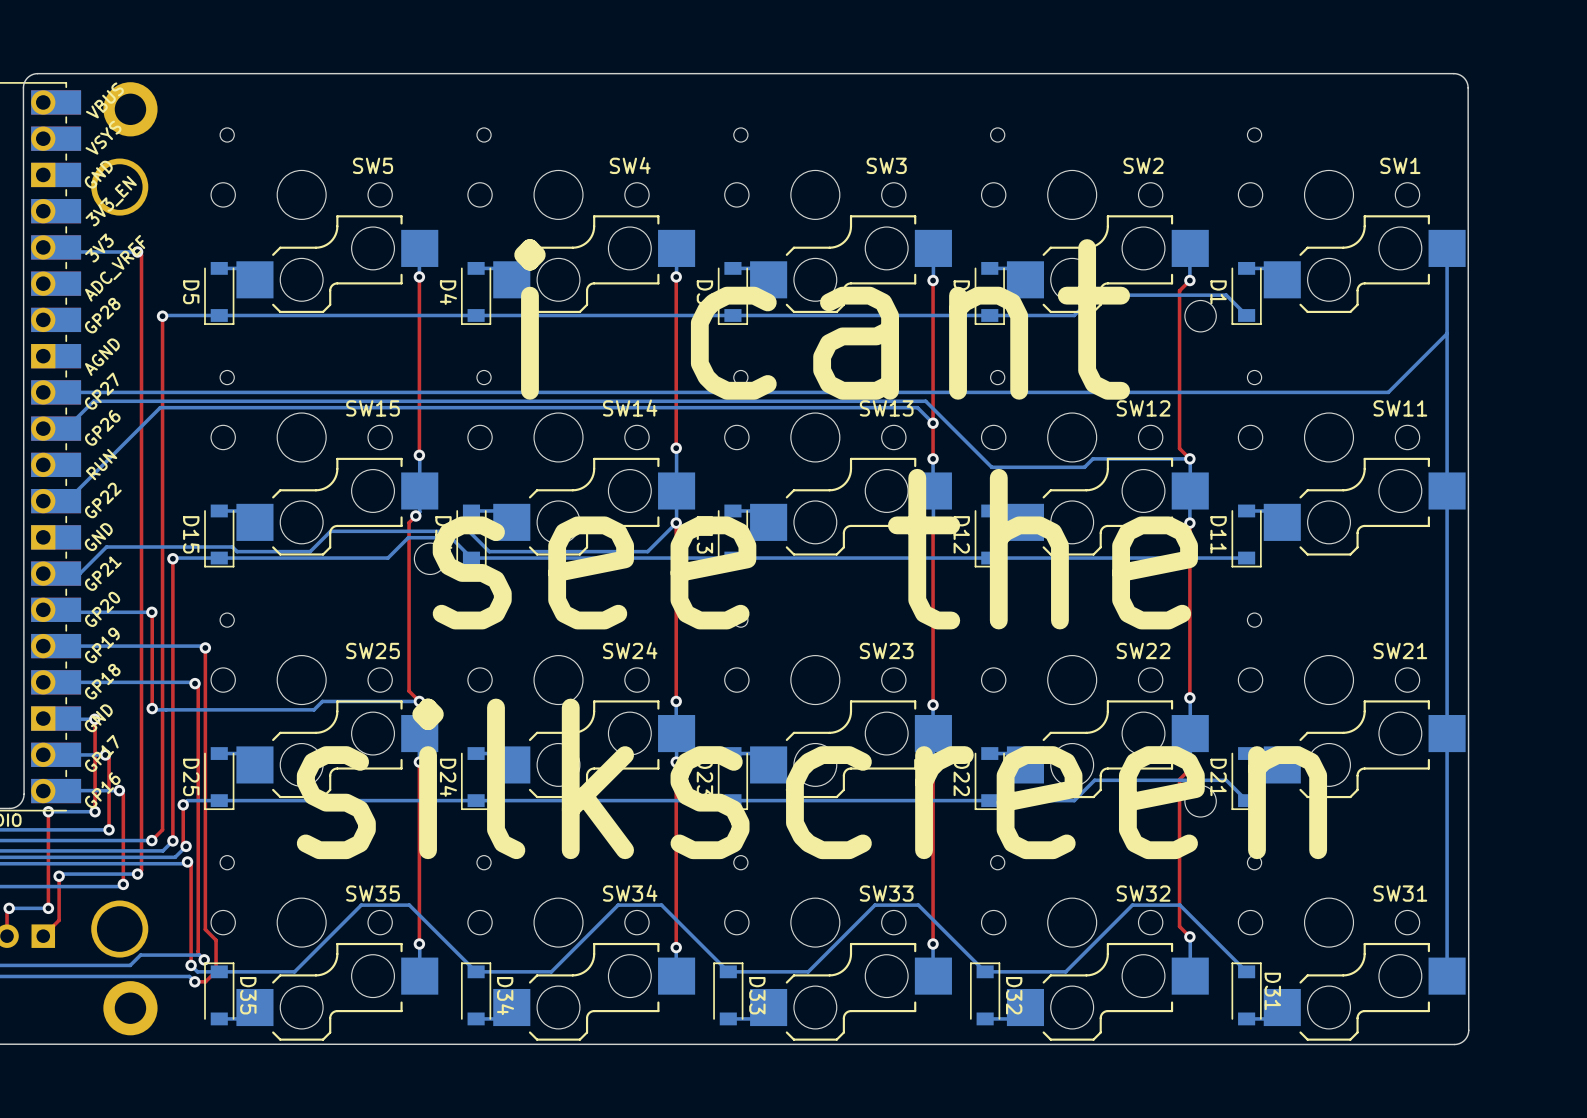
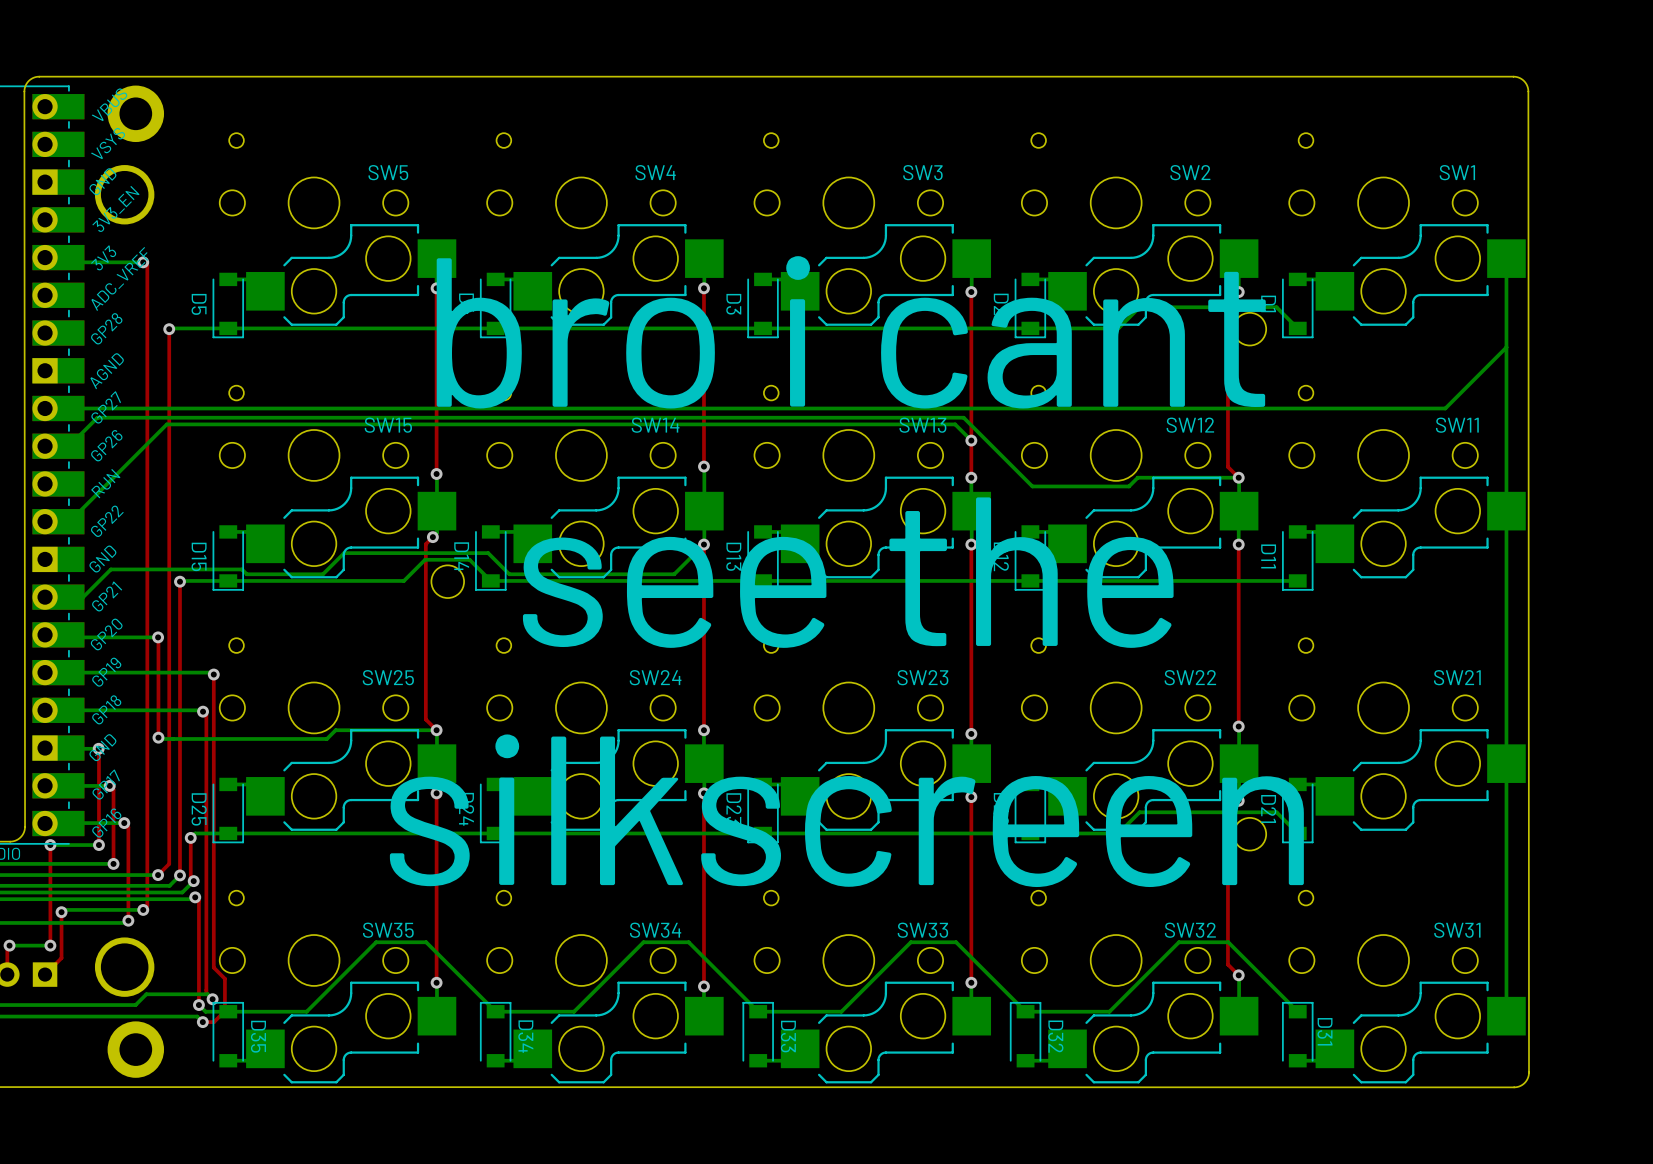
text: i cant (822, 319) -> bro i cant (851, 332)

